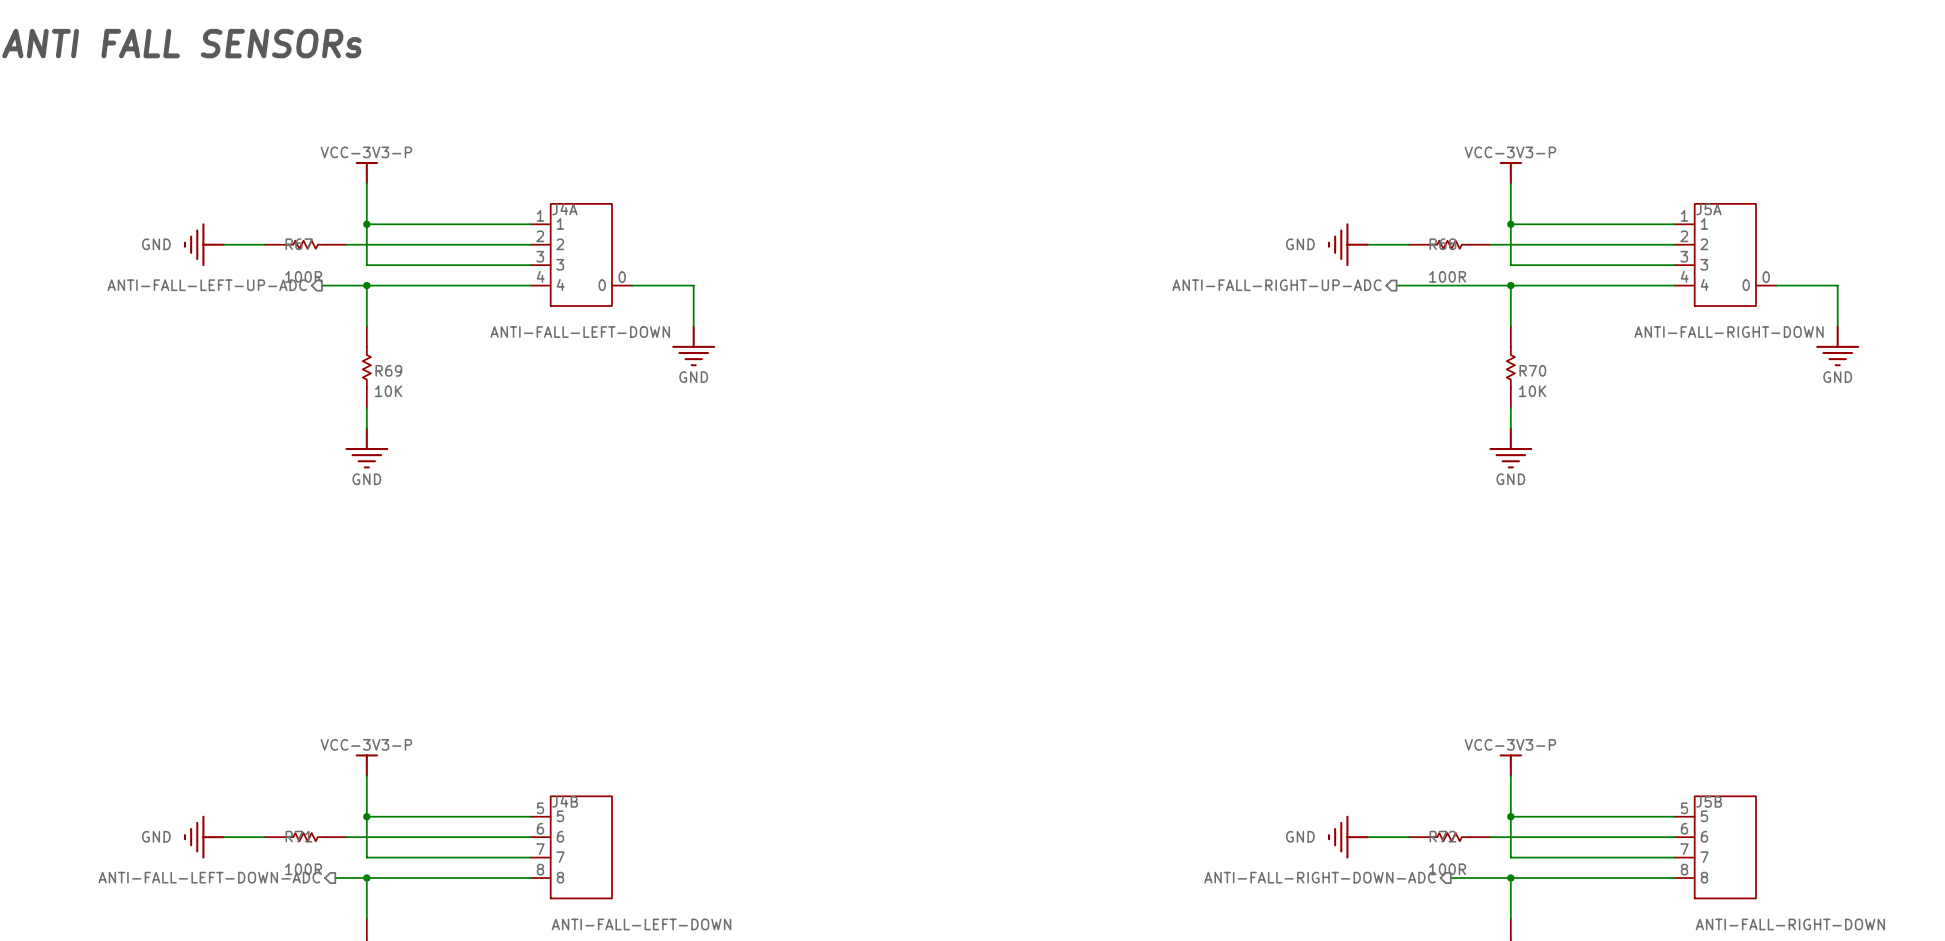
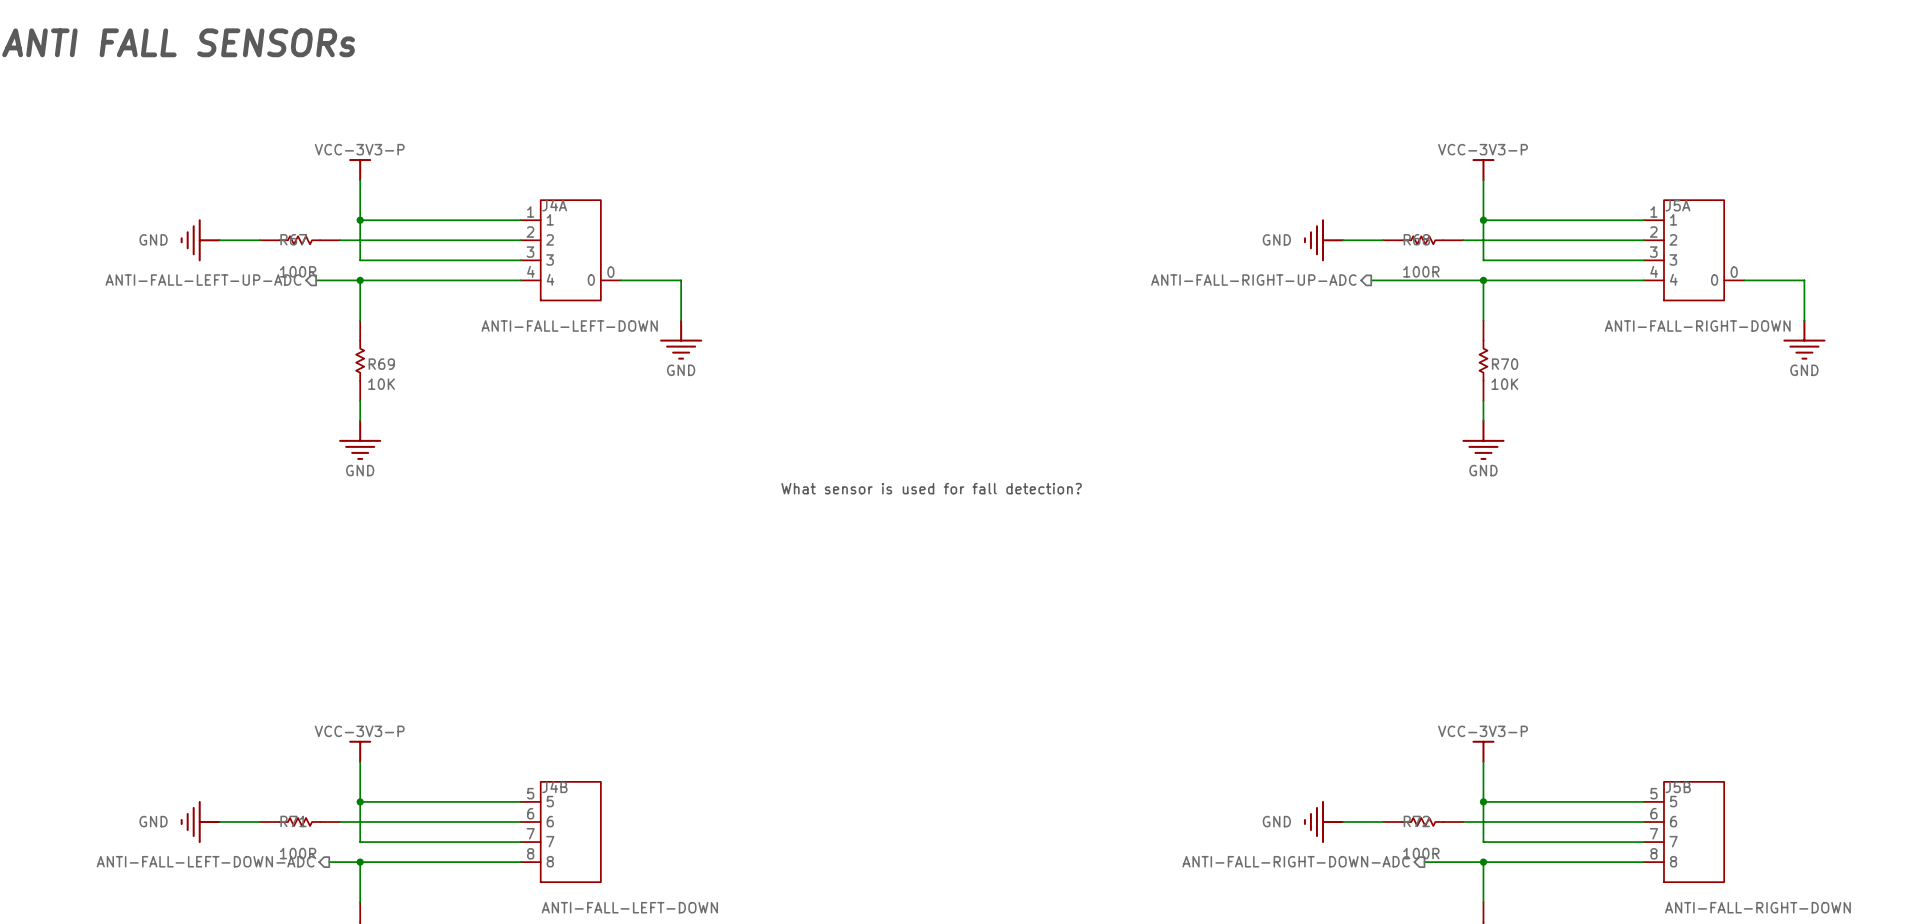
text: none -> What sensor is used for fall detection? (931, 488)

